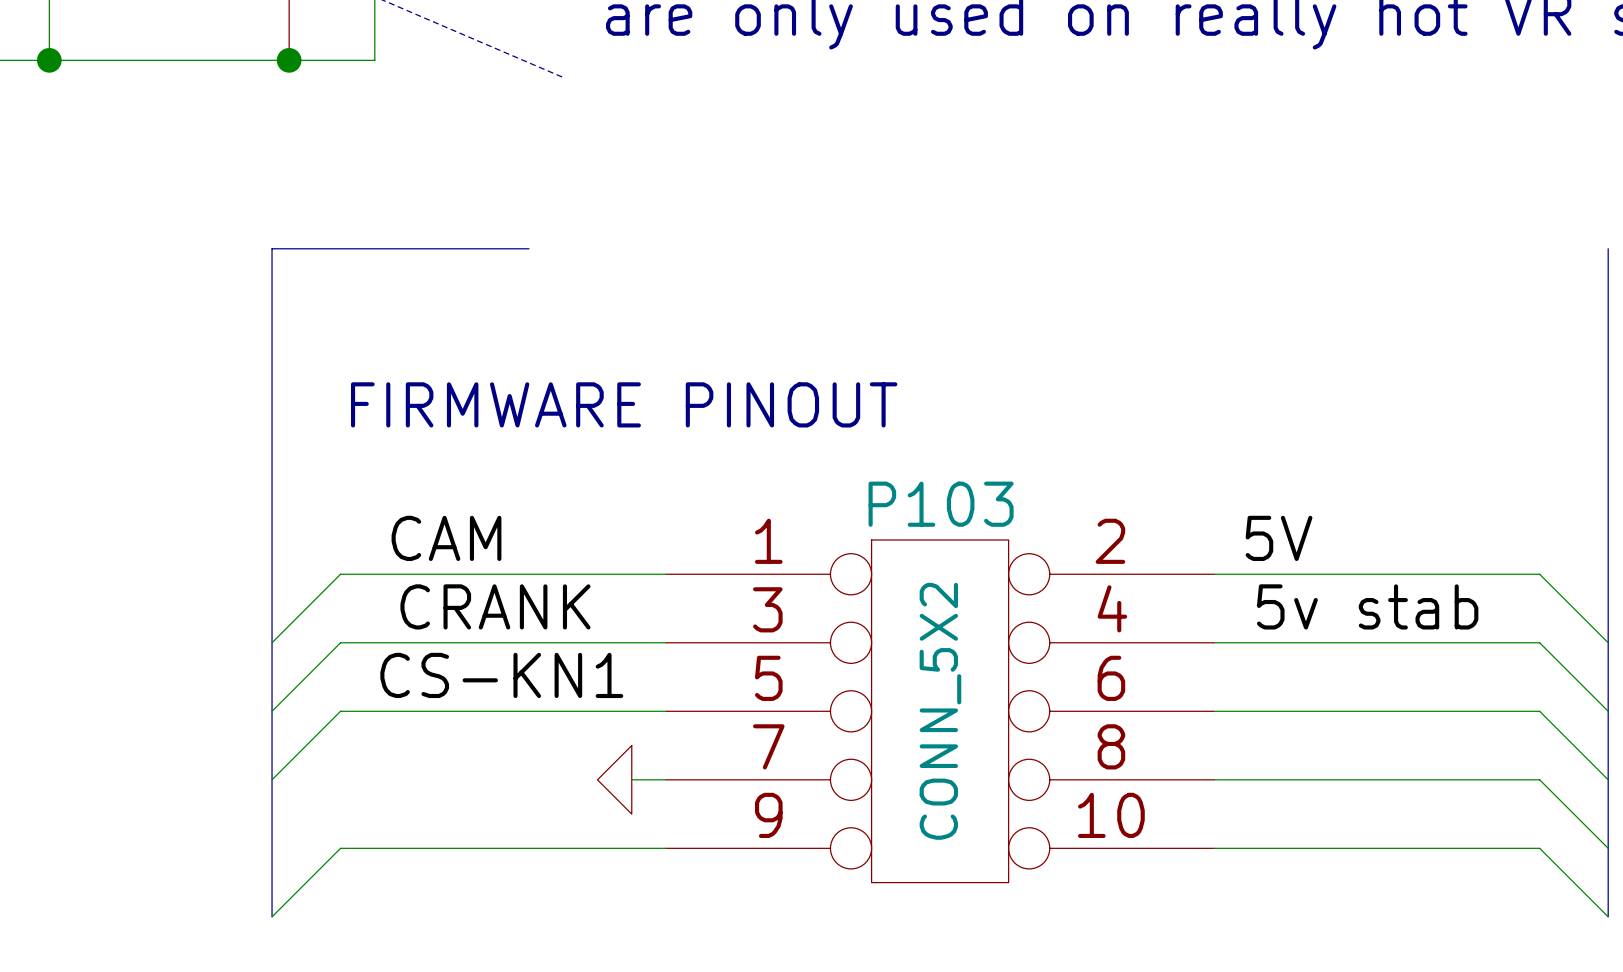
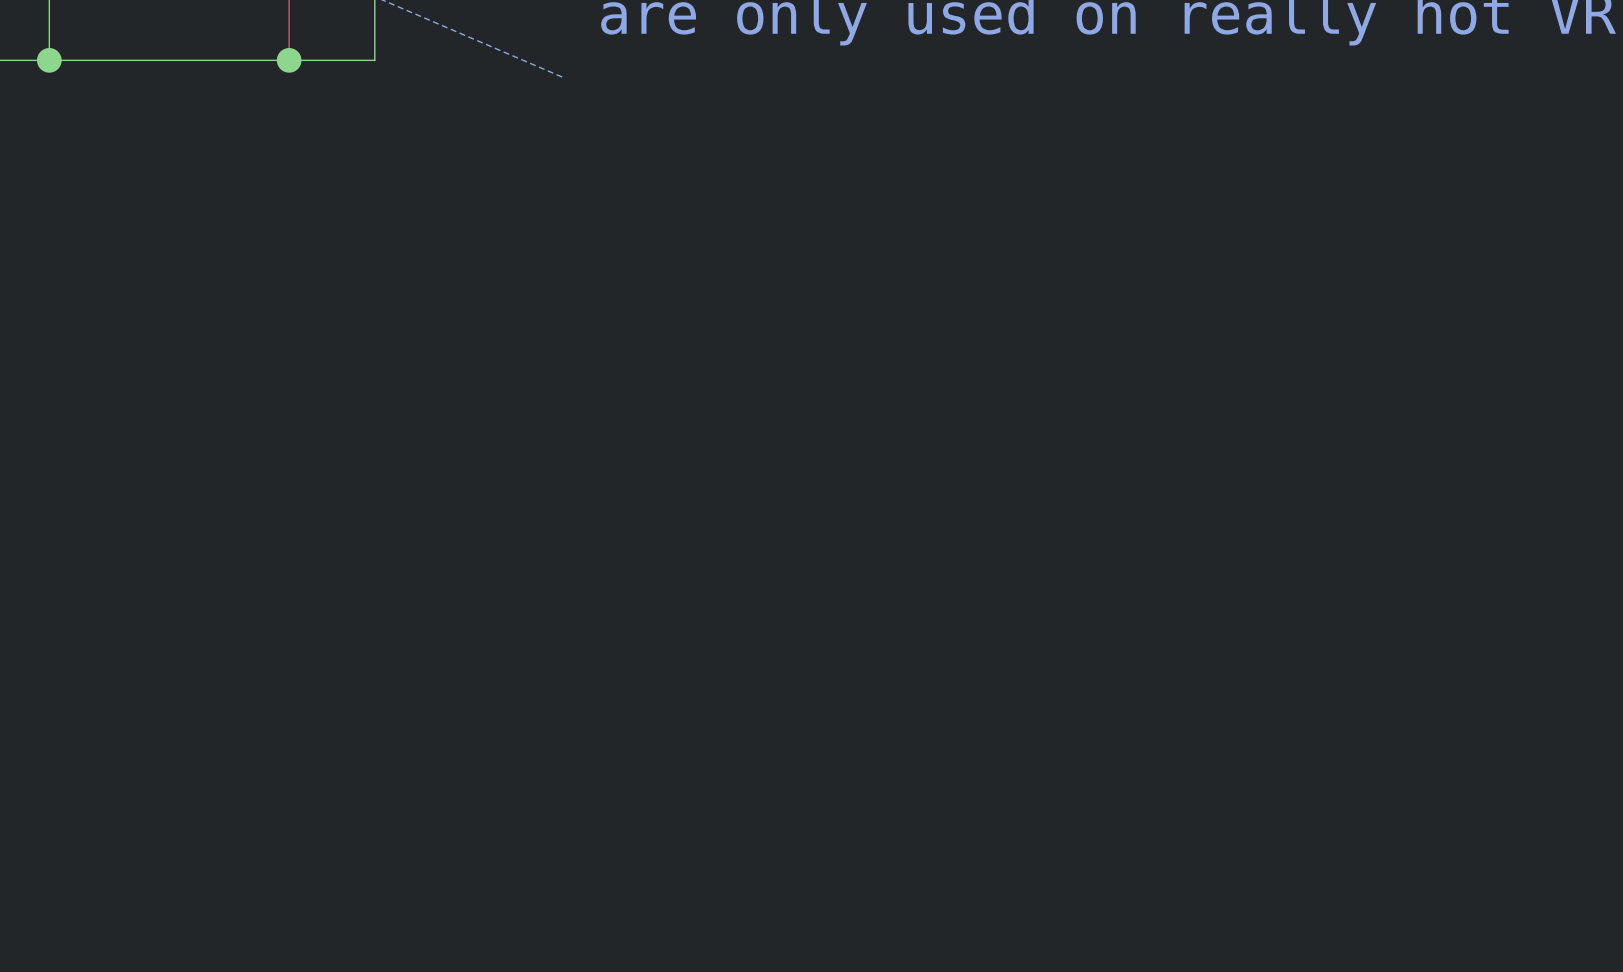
bus: (528, 248) (272, 248) (272, 916) -> none
bus: (1608, 248) (1608, 916) -> none
text: FIRMWARE PINOUT (624, 404) -> none
label: CAM (446, 538) -> none
label: 5V (1279, 538) -> none
wire: (666, 574) (340, 574) (272, 642) -> none
wire: (1214, 574) (1539, 574) (1608, 642) -> none
label: CRANK (495, 606) -> none
label: 5v stab (1367, 606) -> none
wire: (666, 642) (340, 642) (272, 711) -> none
wire: (1214, 642) (1539, 642) (1608, 711) -> none
label: CS-KN1 (501, 675) -> none
wire: (666, 711) (340, 711) (272, 779) -> none
P103: CONN_5X2 (940, 711) -> none
wire: (1214, 711) (1539, 711) (1608, 779) -> none
power symbol: (614, 779) -> none
wire: (631, 779) (666, 779) -> none
wire: (1214, 779) (1539, 779) (1608, 848) -> none
wire: (666, 848) (340, 848) (272, 916) -> none
wire: (1214, 848) (1539, 848) (1608, 916) -> none

